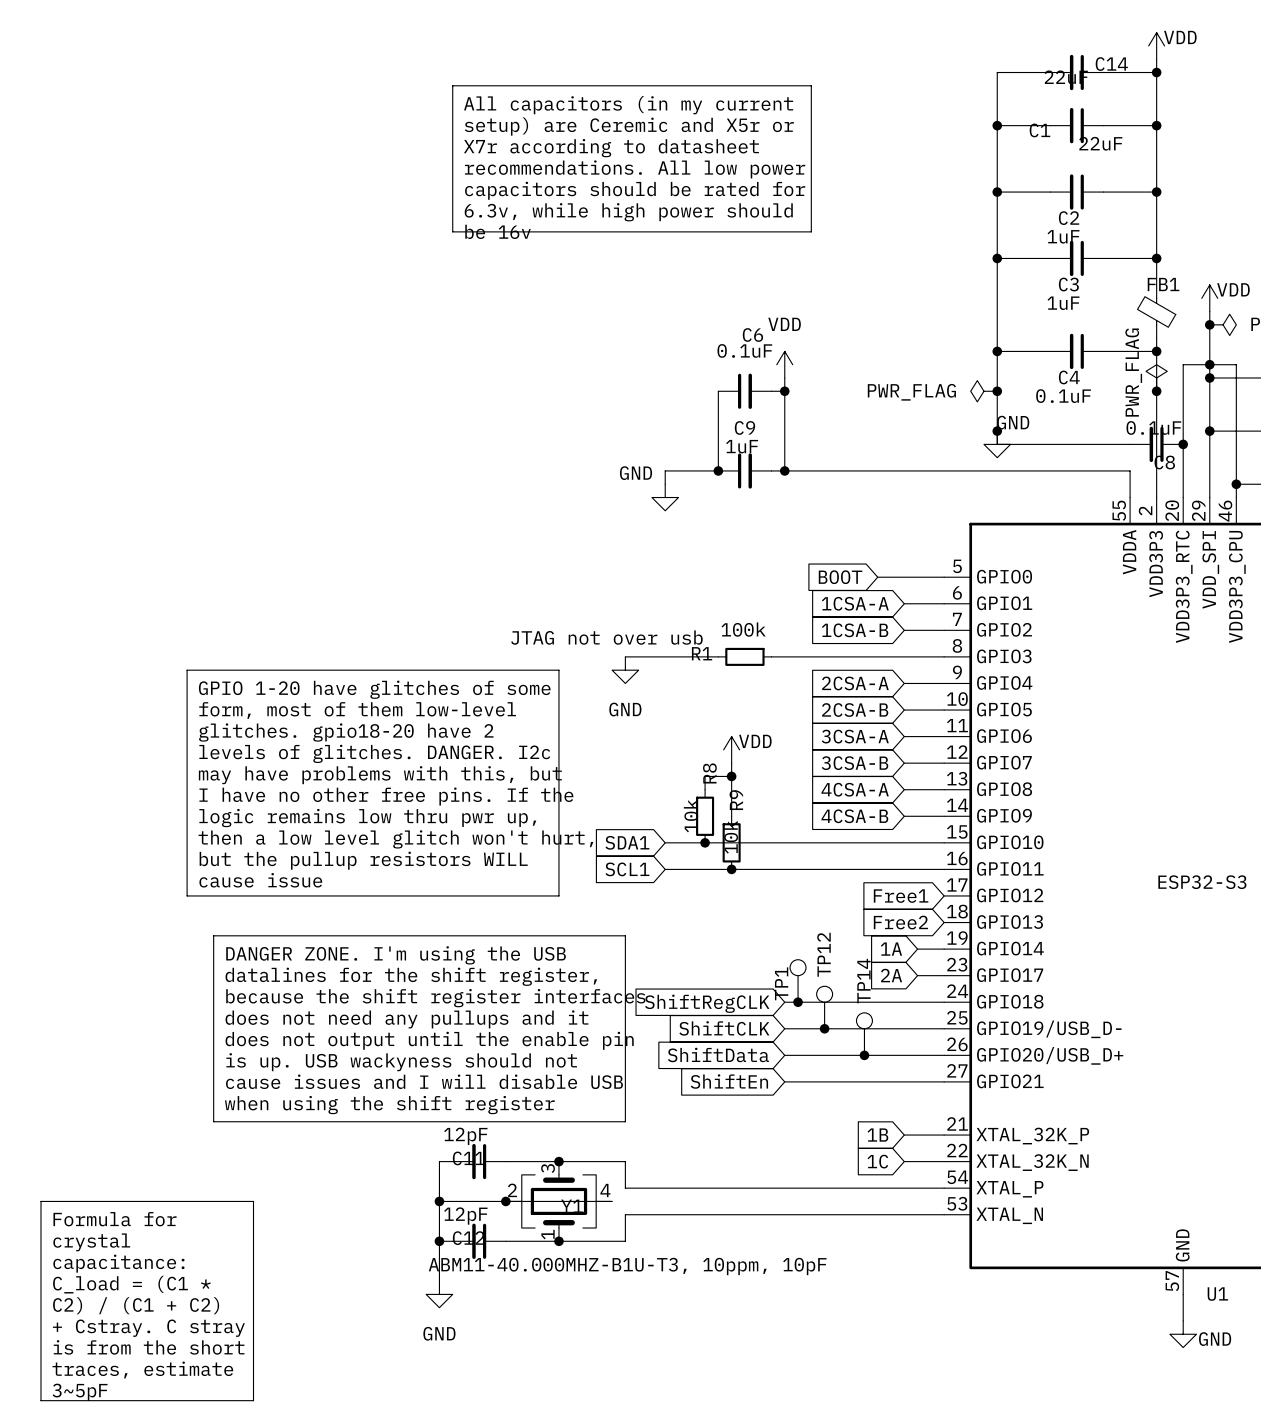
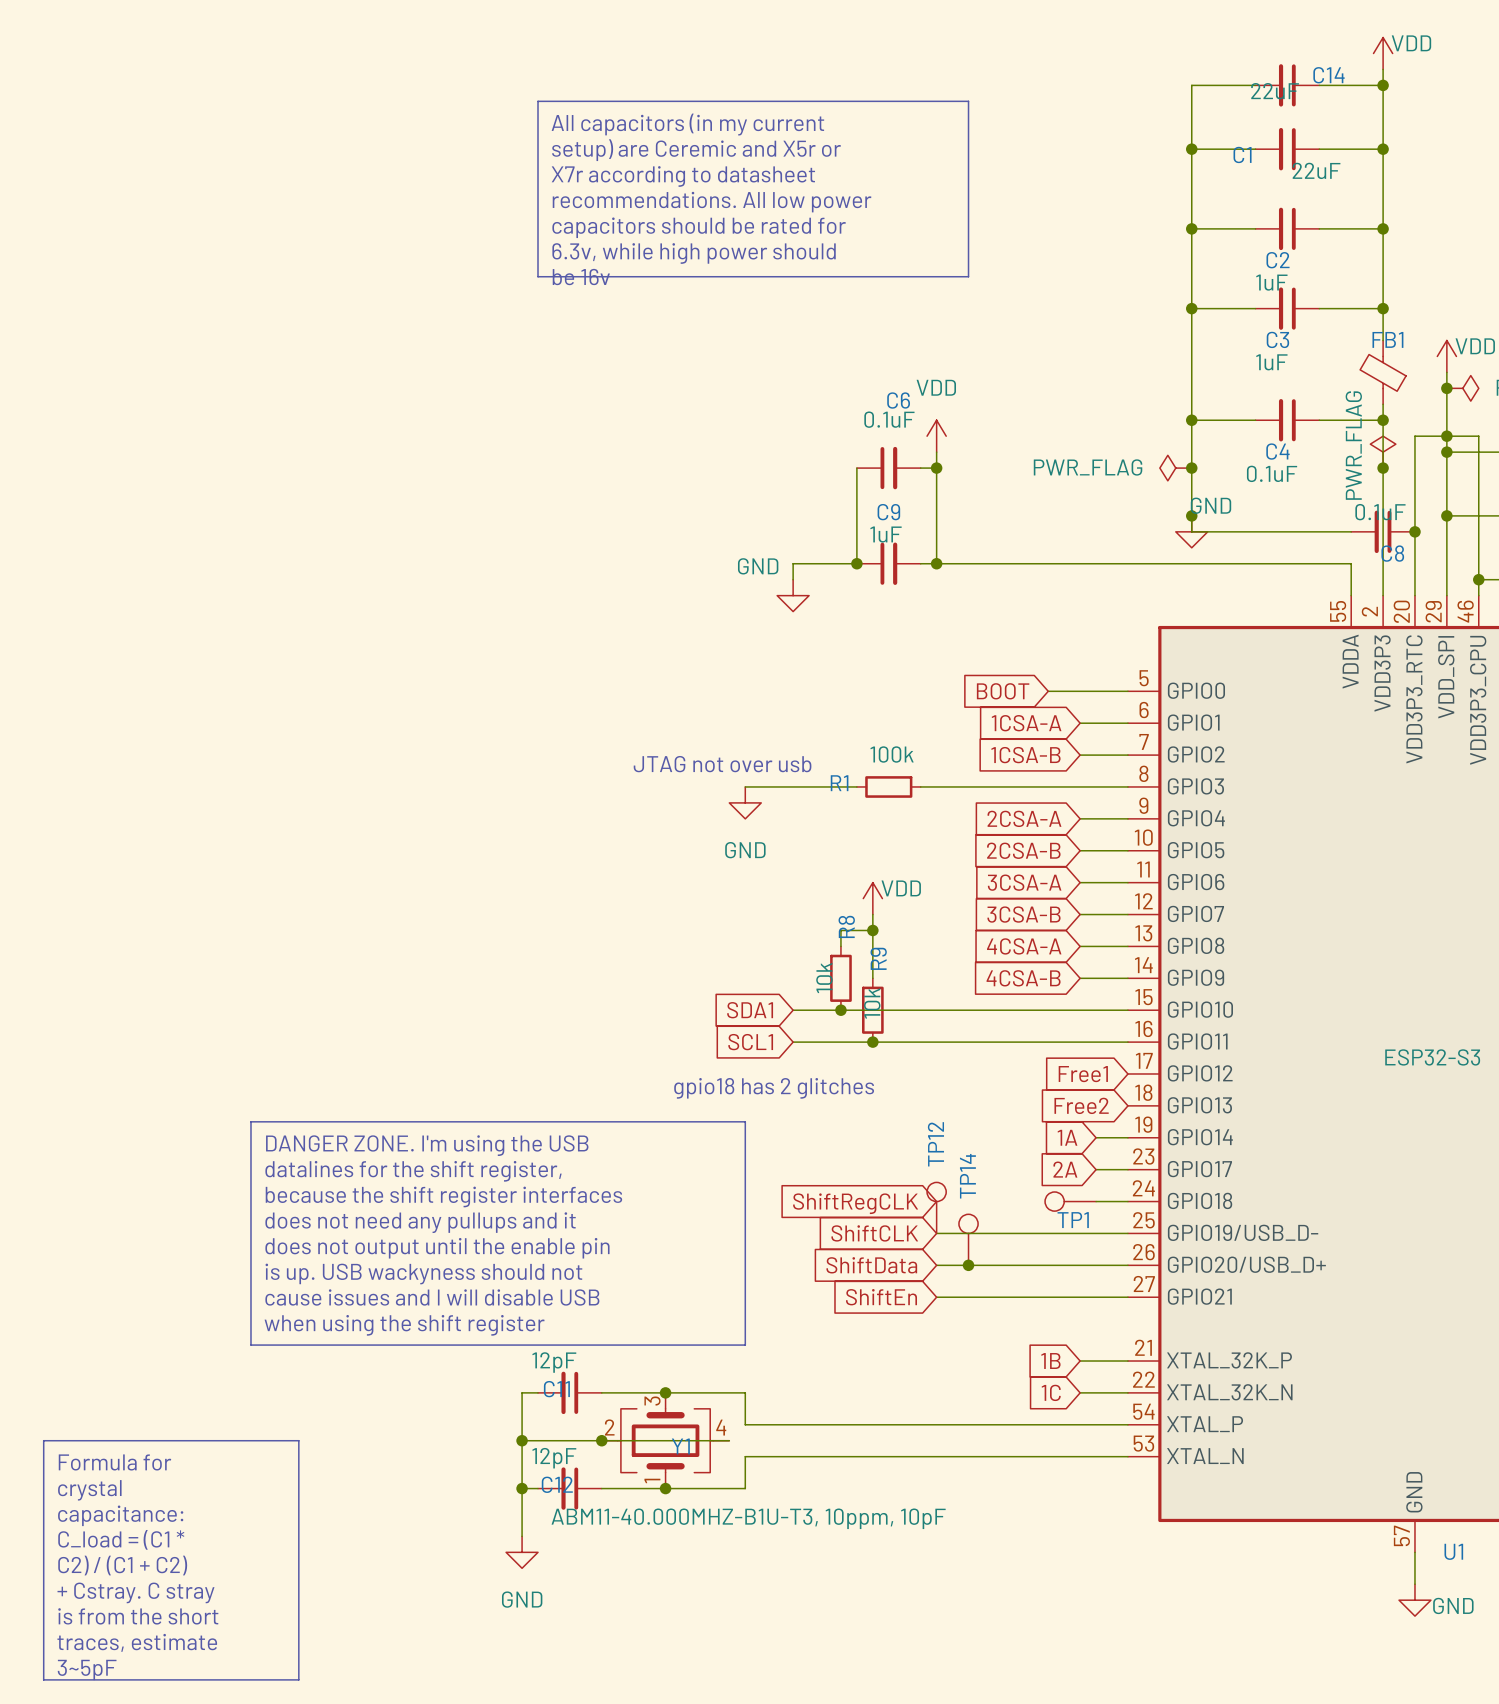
line: (187, 670) (558, 670) (558, 895) (187, 895) (187, 670) -> none
text: GPIO 1-20 have glitches of some (374, 689) -> none
text: form, most of them low-level (357, 710) -> none
text: glitches. gpio18-20 have 2 (346, 732) -> none
text: levels of glitches. DANGER. I2c (374, 753) -> none
text: may have problems with this, but (380, 775) -> none
text: I have no other free pins. If the (386, 796) -> none
text: logic remains low thru pwr up, (367, 818) -> none
text: then a low level glitch won't hurt, (395, 839) -> none
text: but the pullup resistors WILL (363, 860) -> none
text: cause issue (260, 880) -> none
text: none -> gpio18 has 2 glitches (774, 1088)
TP1 rotation: 0° (798, 967) -> 90° counterclockwise (1054, 1201)
TP1 position: (798, 980) -> (1070, 1201)
wire: (784, 1002) (917, 1002) -> none
junction: (798, 1002) -> none
TP12 position: (824, 1007) -> (936, 1207)
junction: (824, 1028) -> none
TP14 position: (864, 1034) -> (968, 1239)
junction: none -> (968, 1265)
junction: (864, 1055) -> none

